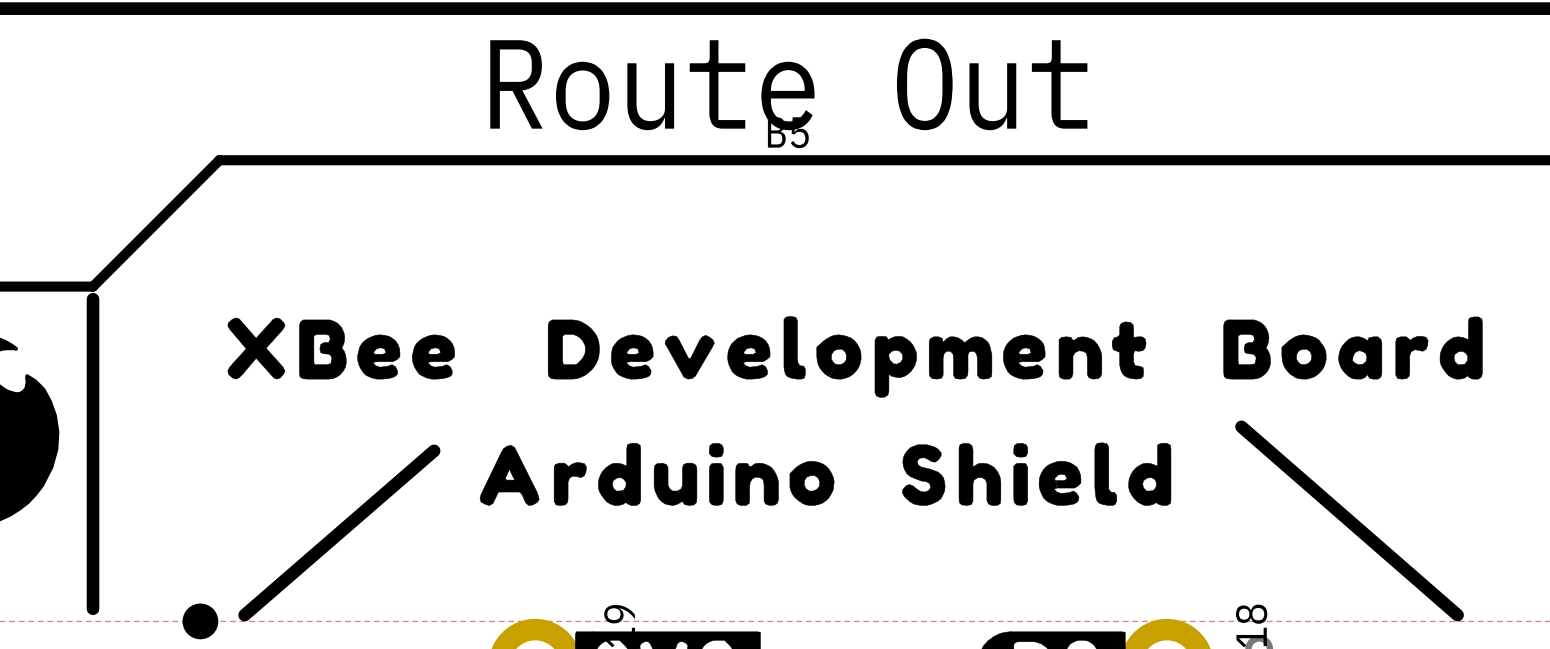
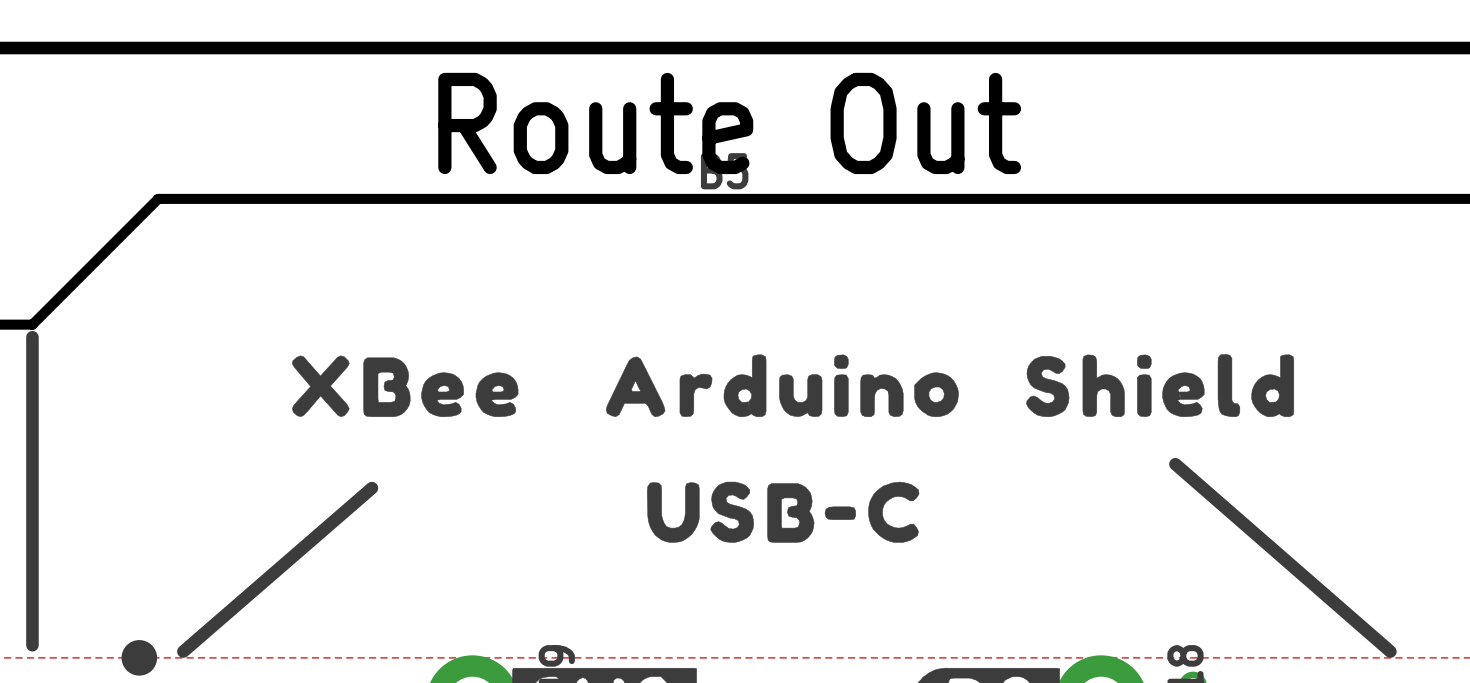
drawing: [547, 316, 1147, 398] -> none
drawing: [1223, 316, 1483, 380] -> none
drawing position: (341, 348) -> (405, 386)
drawing: none -> [647, 481, 920, 543]
drawing position: (657, 474) -> (782, 385)
drawing position: (1036, 474) -> (1160, 385)

